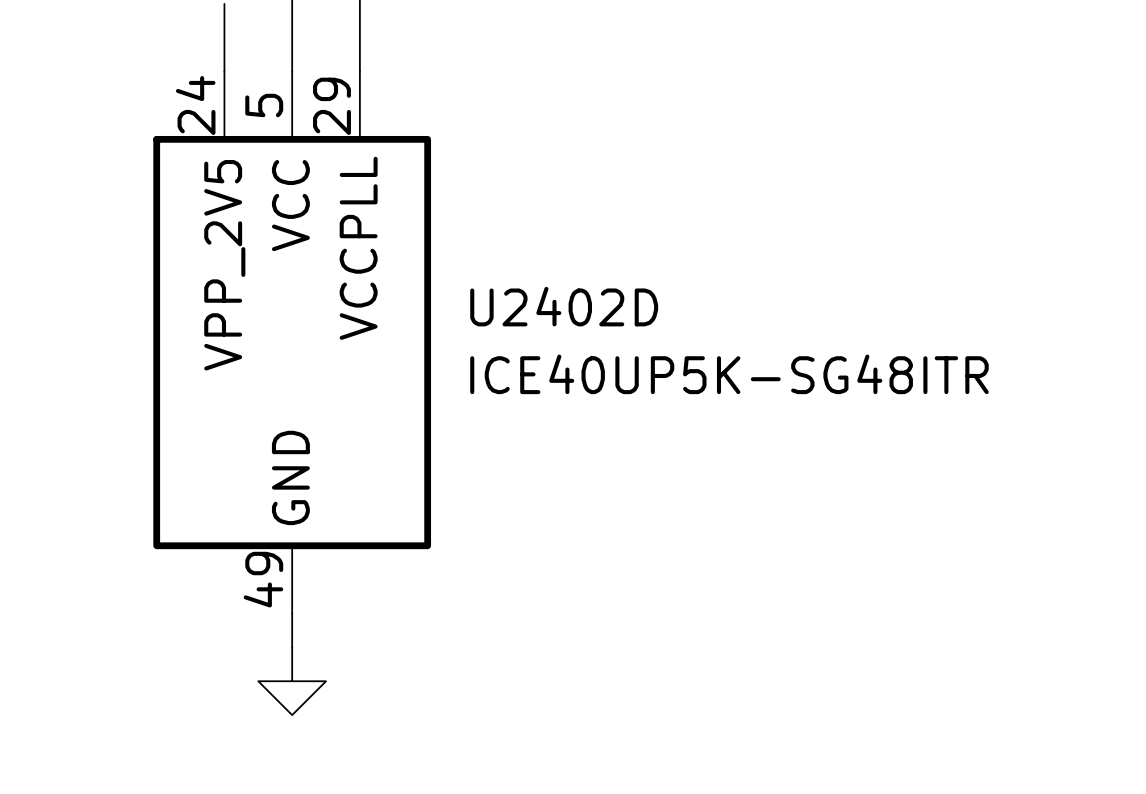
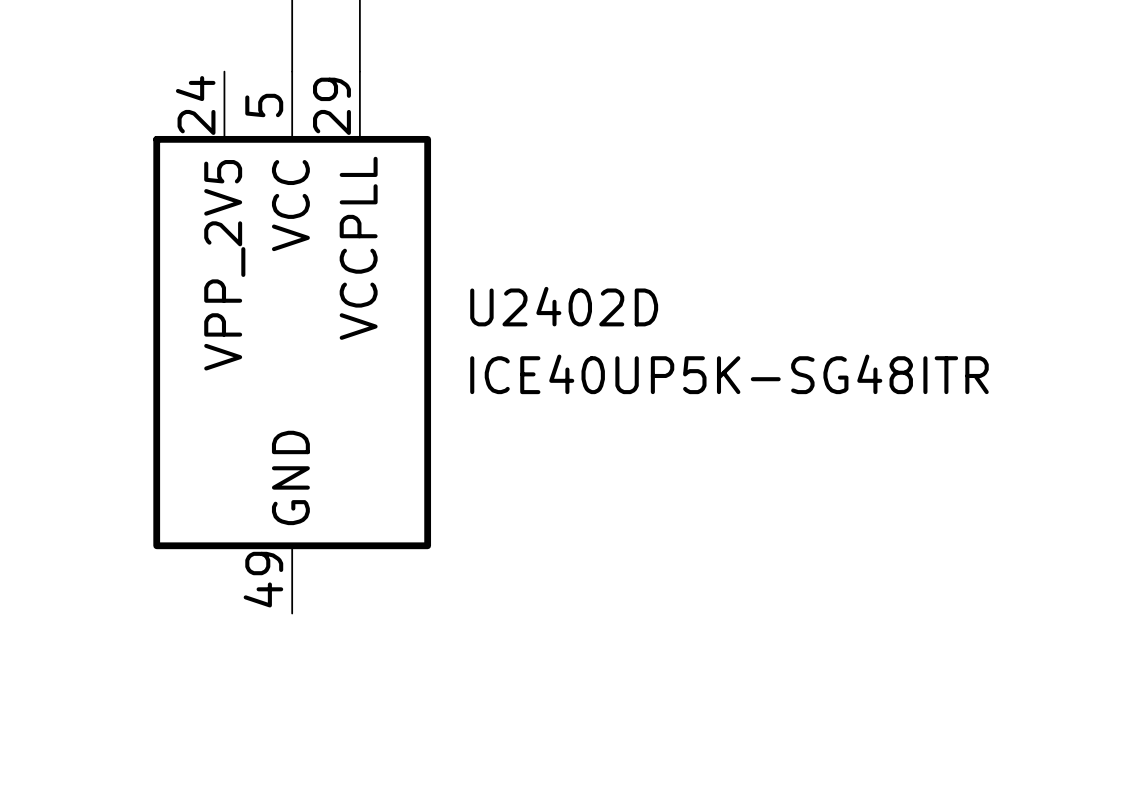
wire: (224, 3) (224, 71) -> none
wire: (292, 613) (292, 647) -> none
power symbol: (292, 681) -> none

